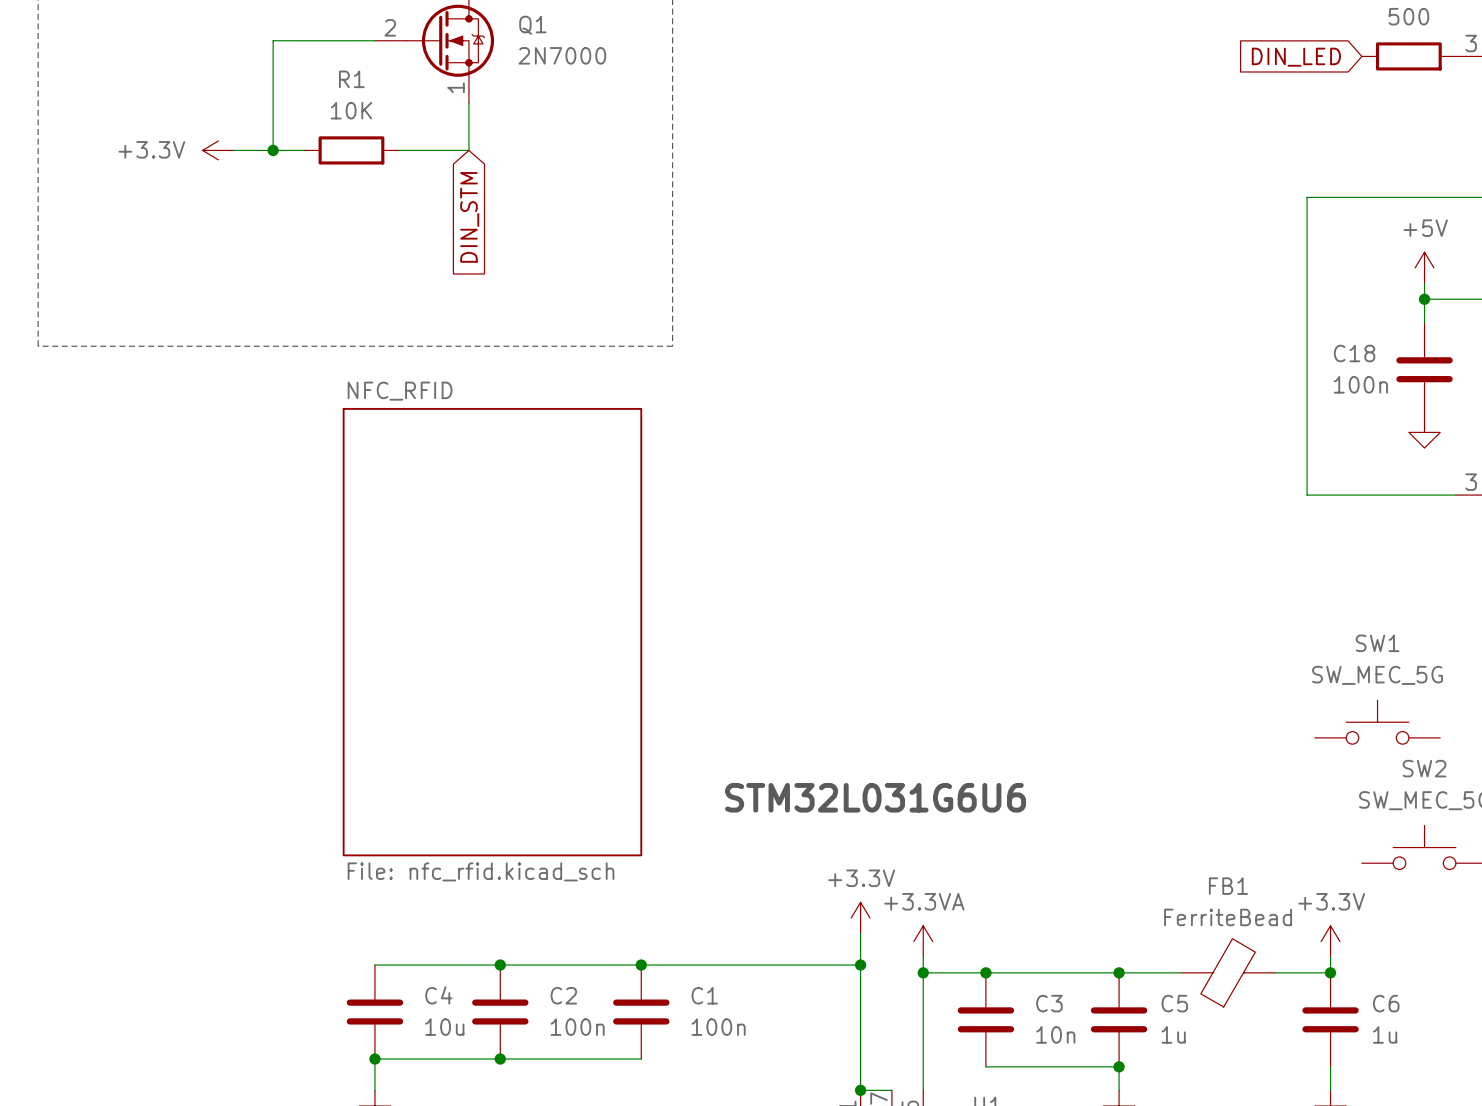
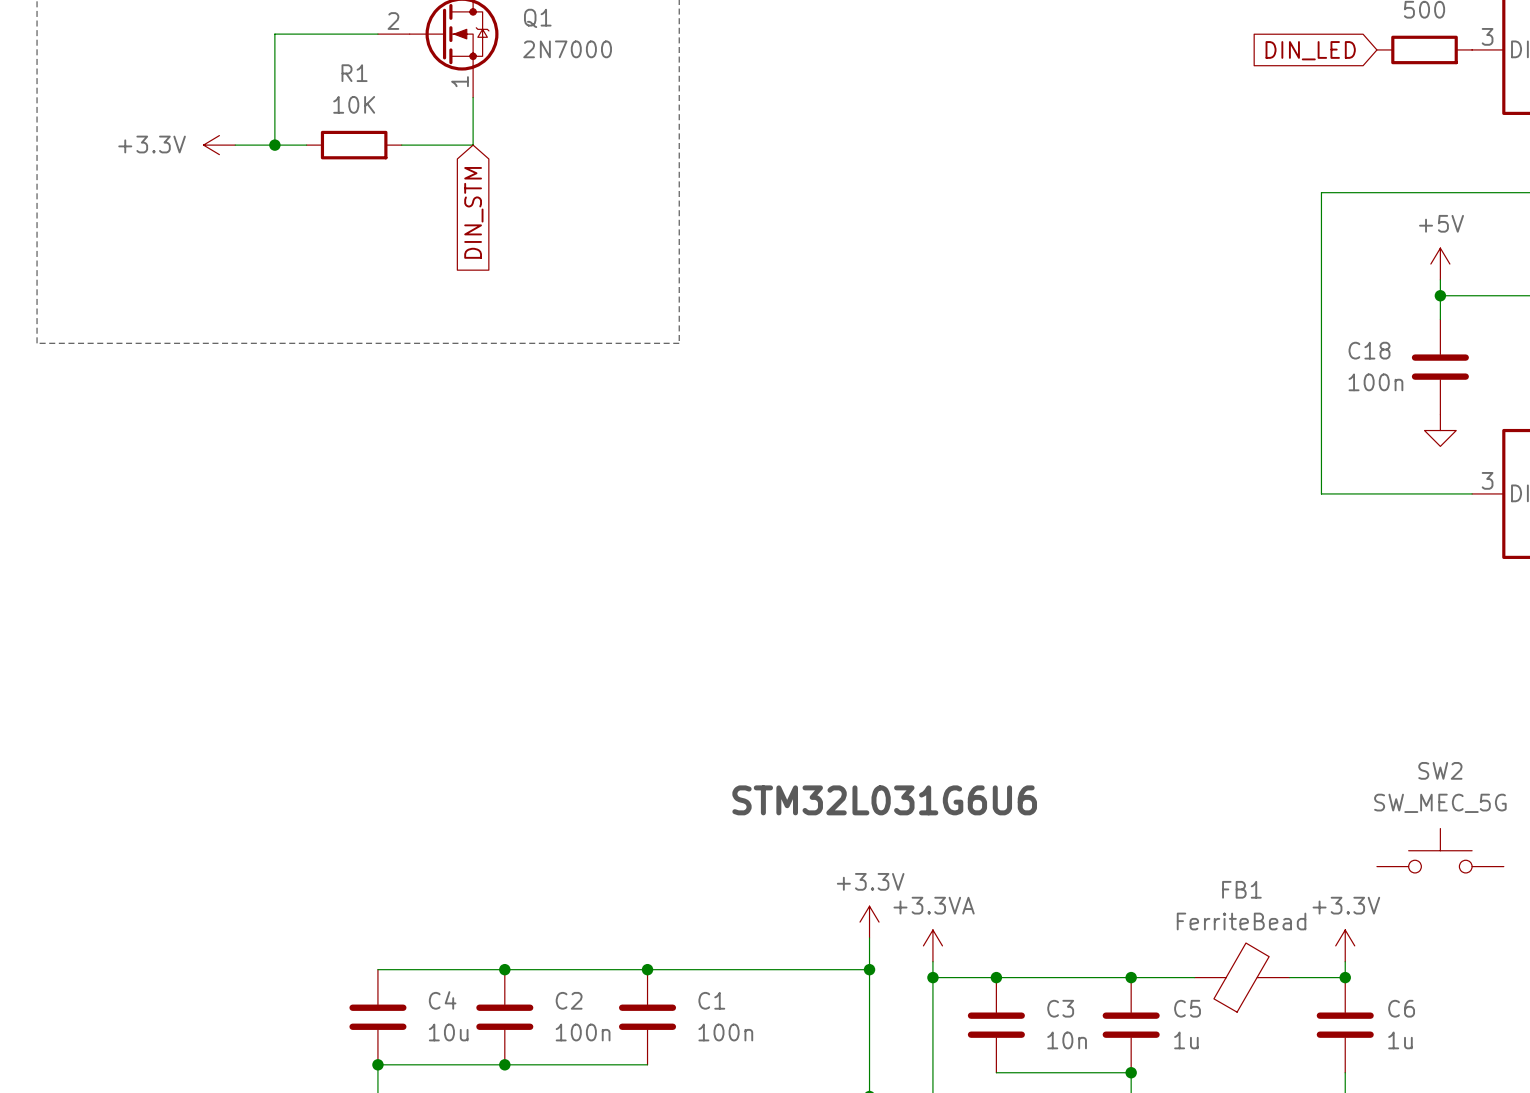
sheet NFC_RFID: File: nfc_rfid.kicad_sch (492, 632) -> none
SW1: SW_MEC_5G (1377, 722) -> none

